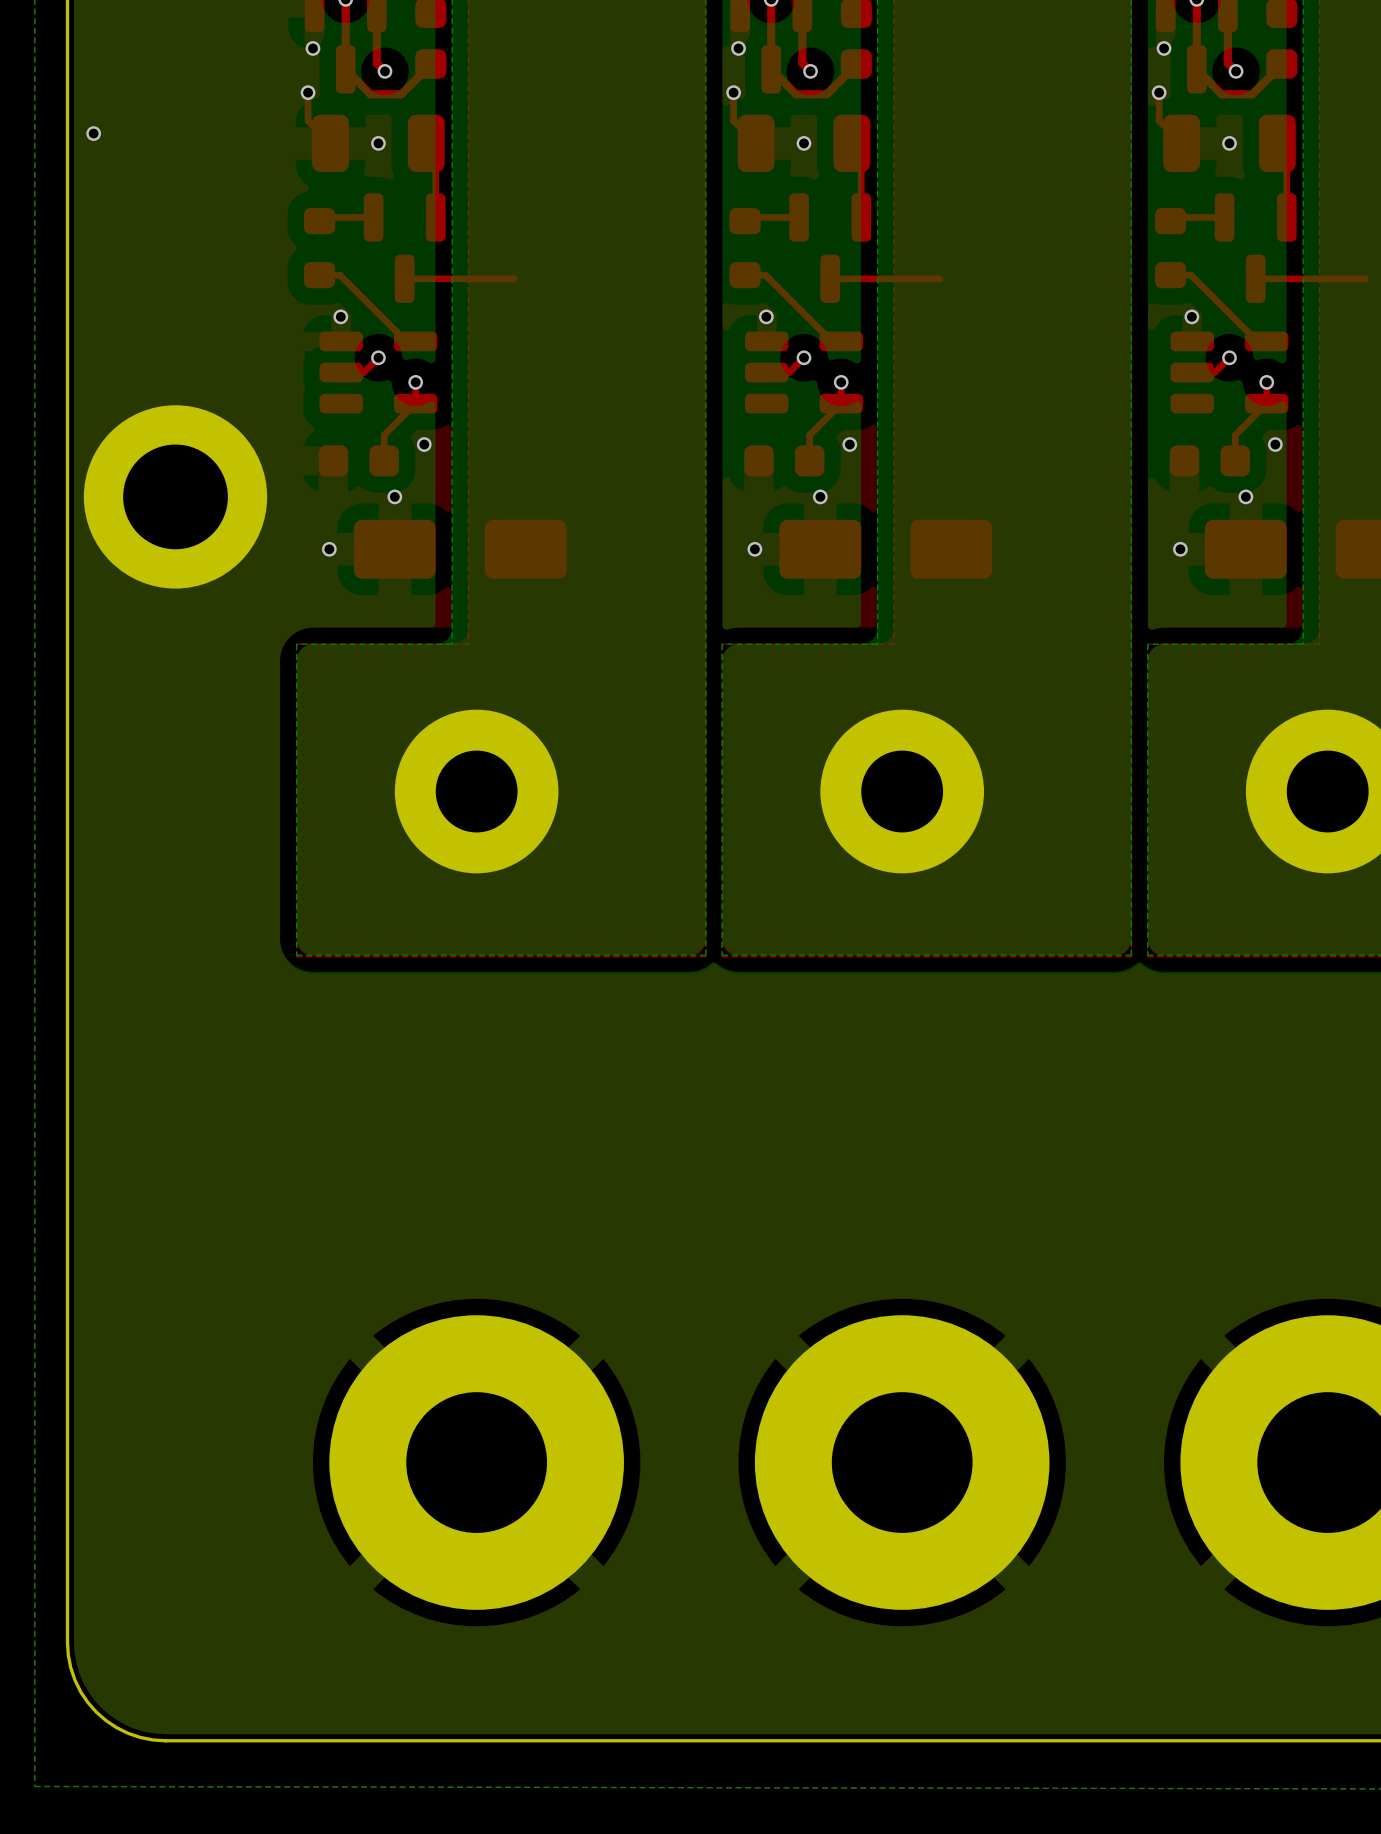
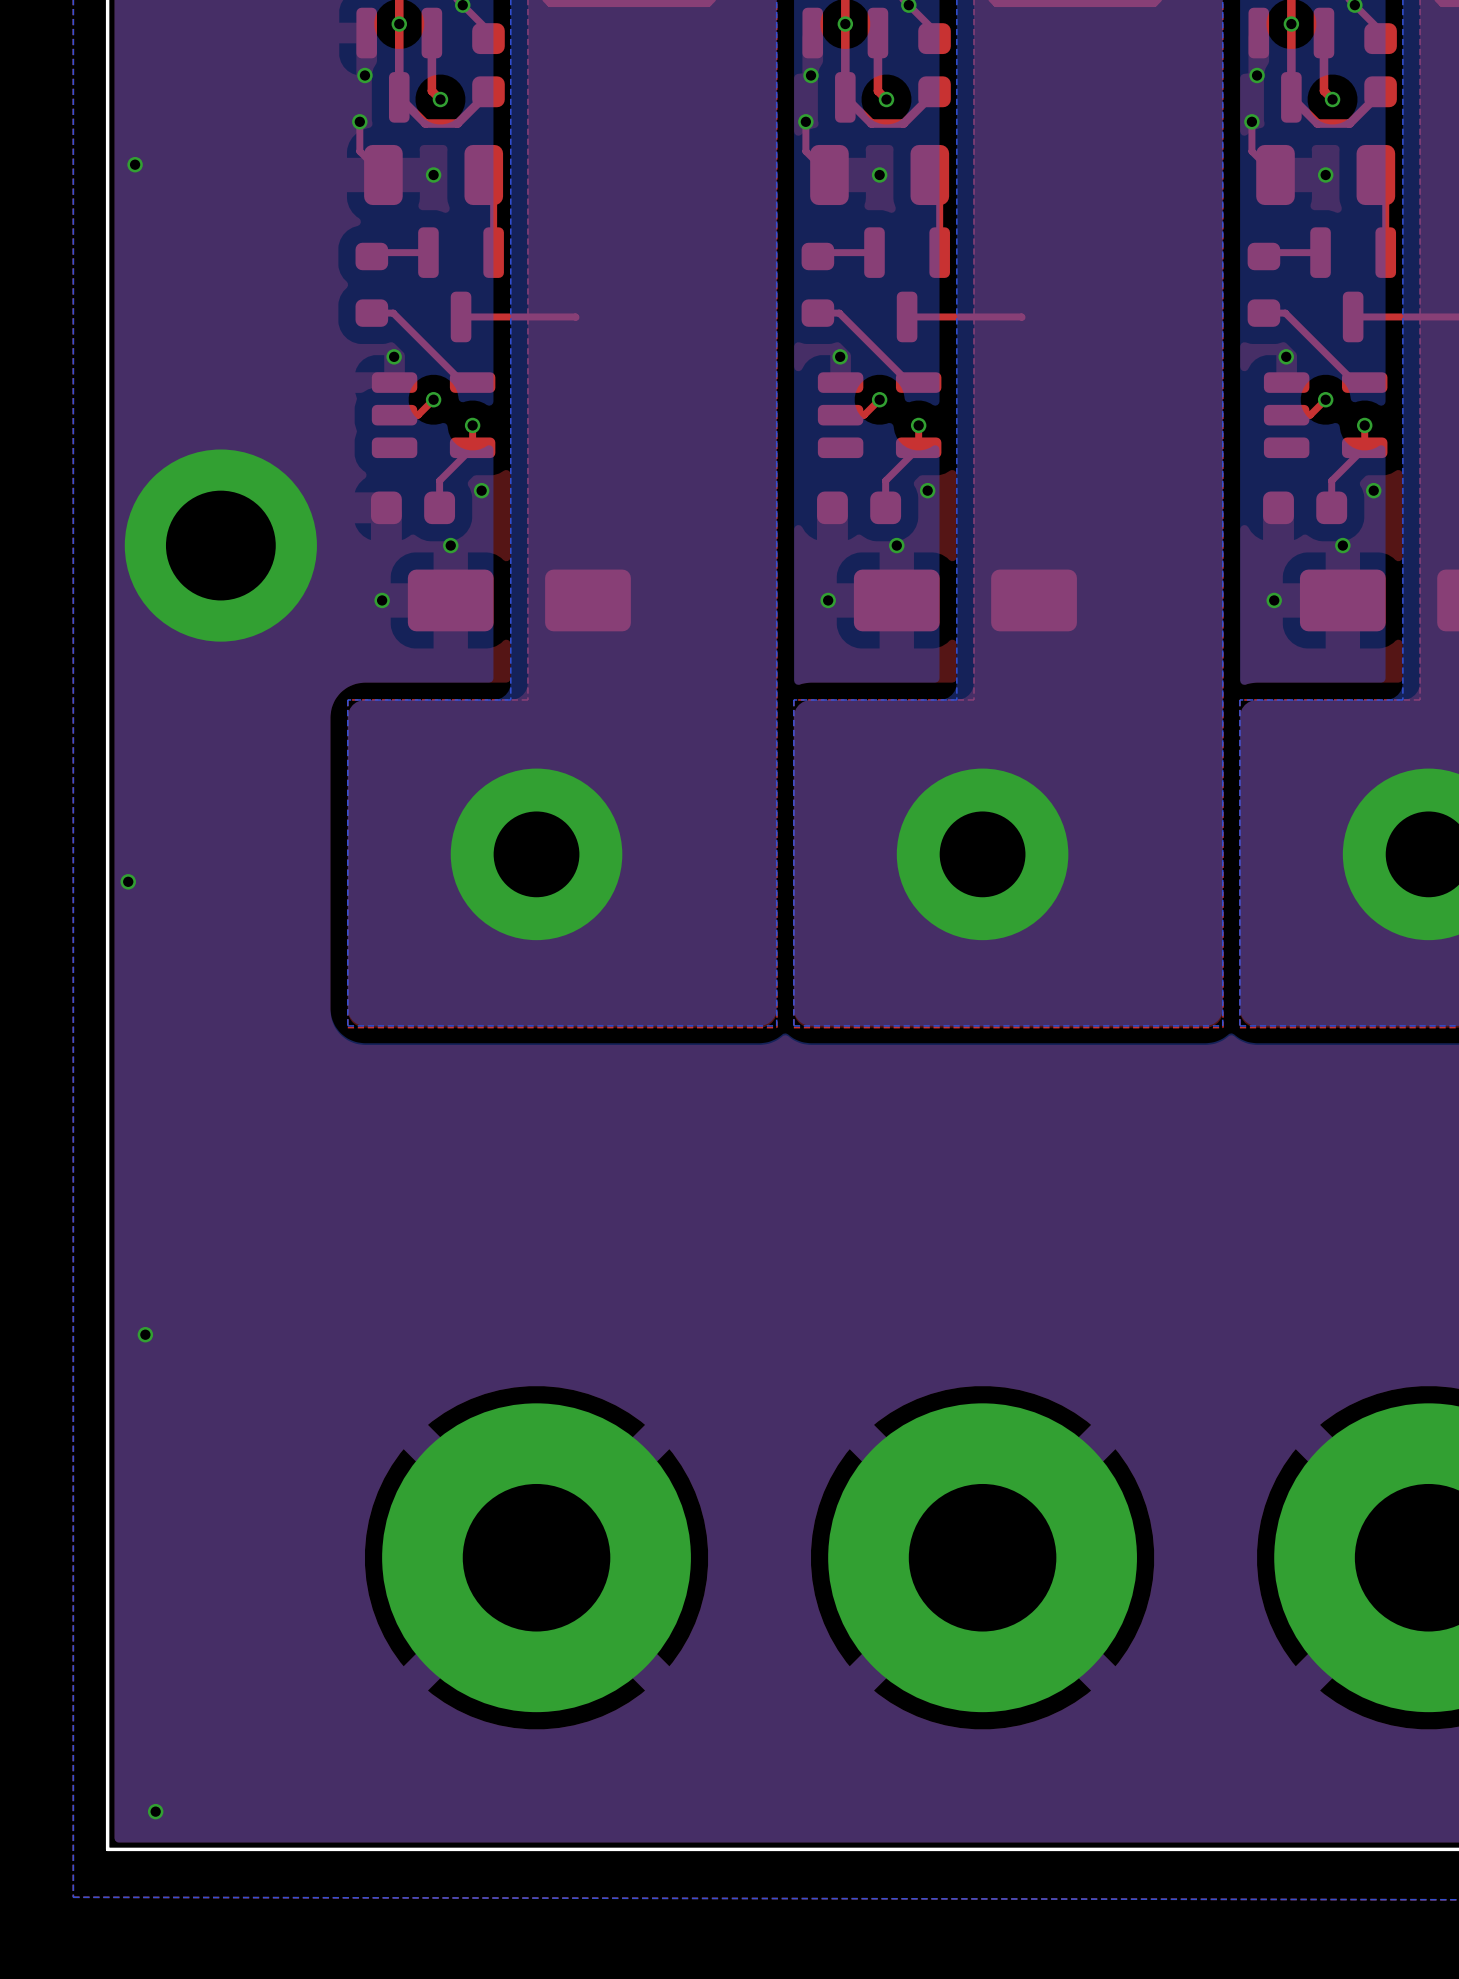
via: none -> (128, 881)
via: none -> (145, 1334)
board edge: (67, 1642) (68, 1655) (74, 1680) (80, 1691) (96, 1712) (116, 1727) (128, 1733) (152, 1739) (165, 1740) -> (107, 1746) (107, 1849) (210, 1849)
via: none -> (155, 1811)

